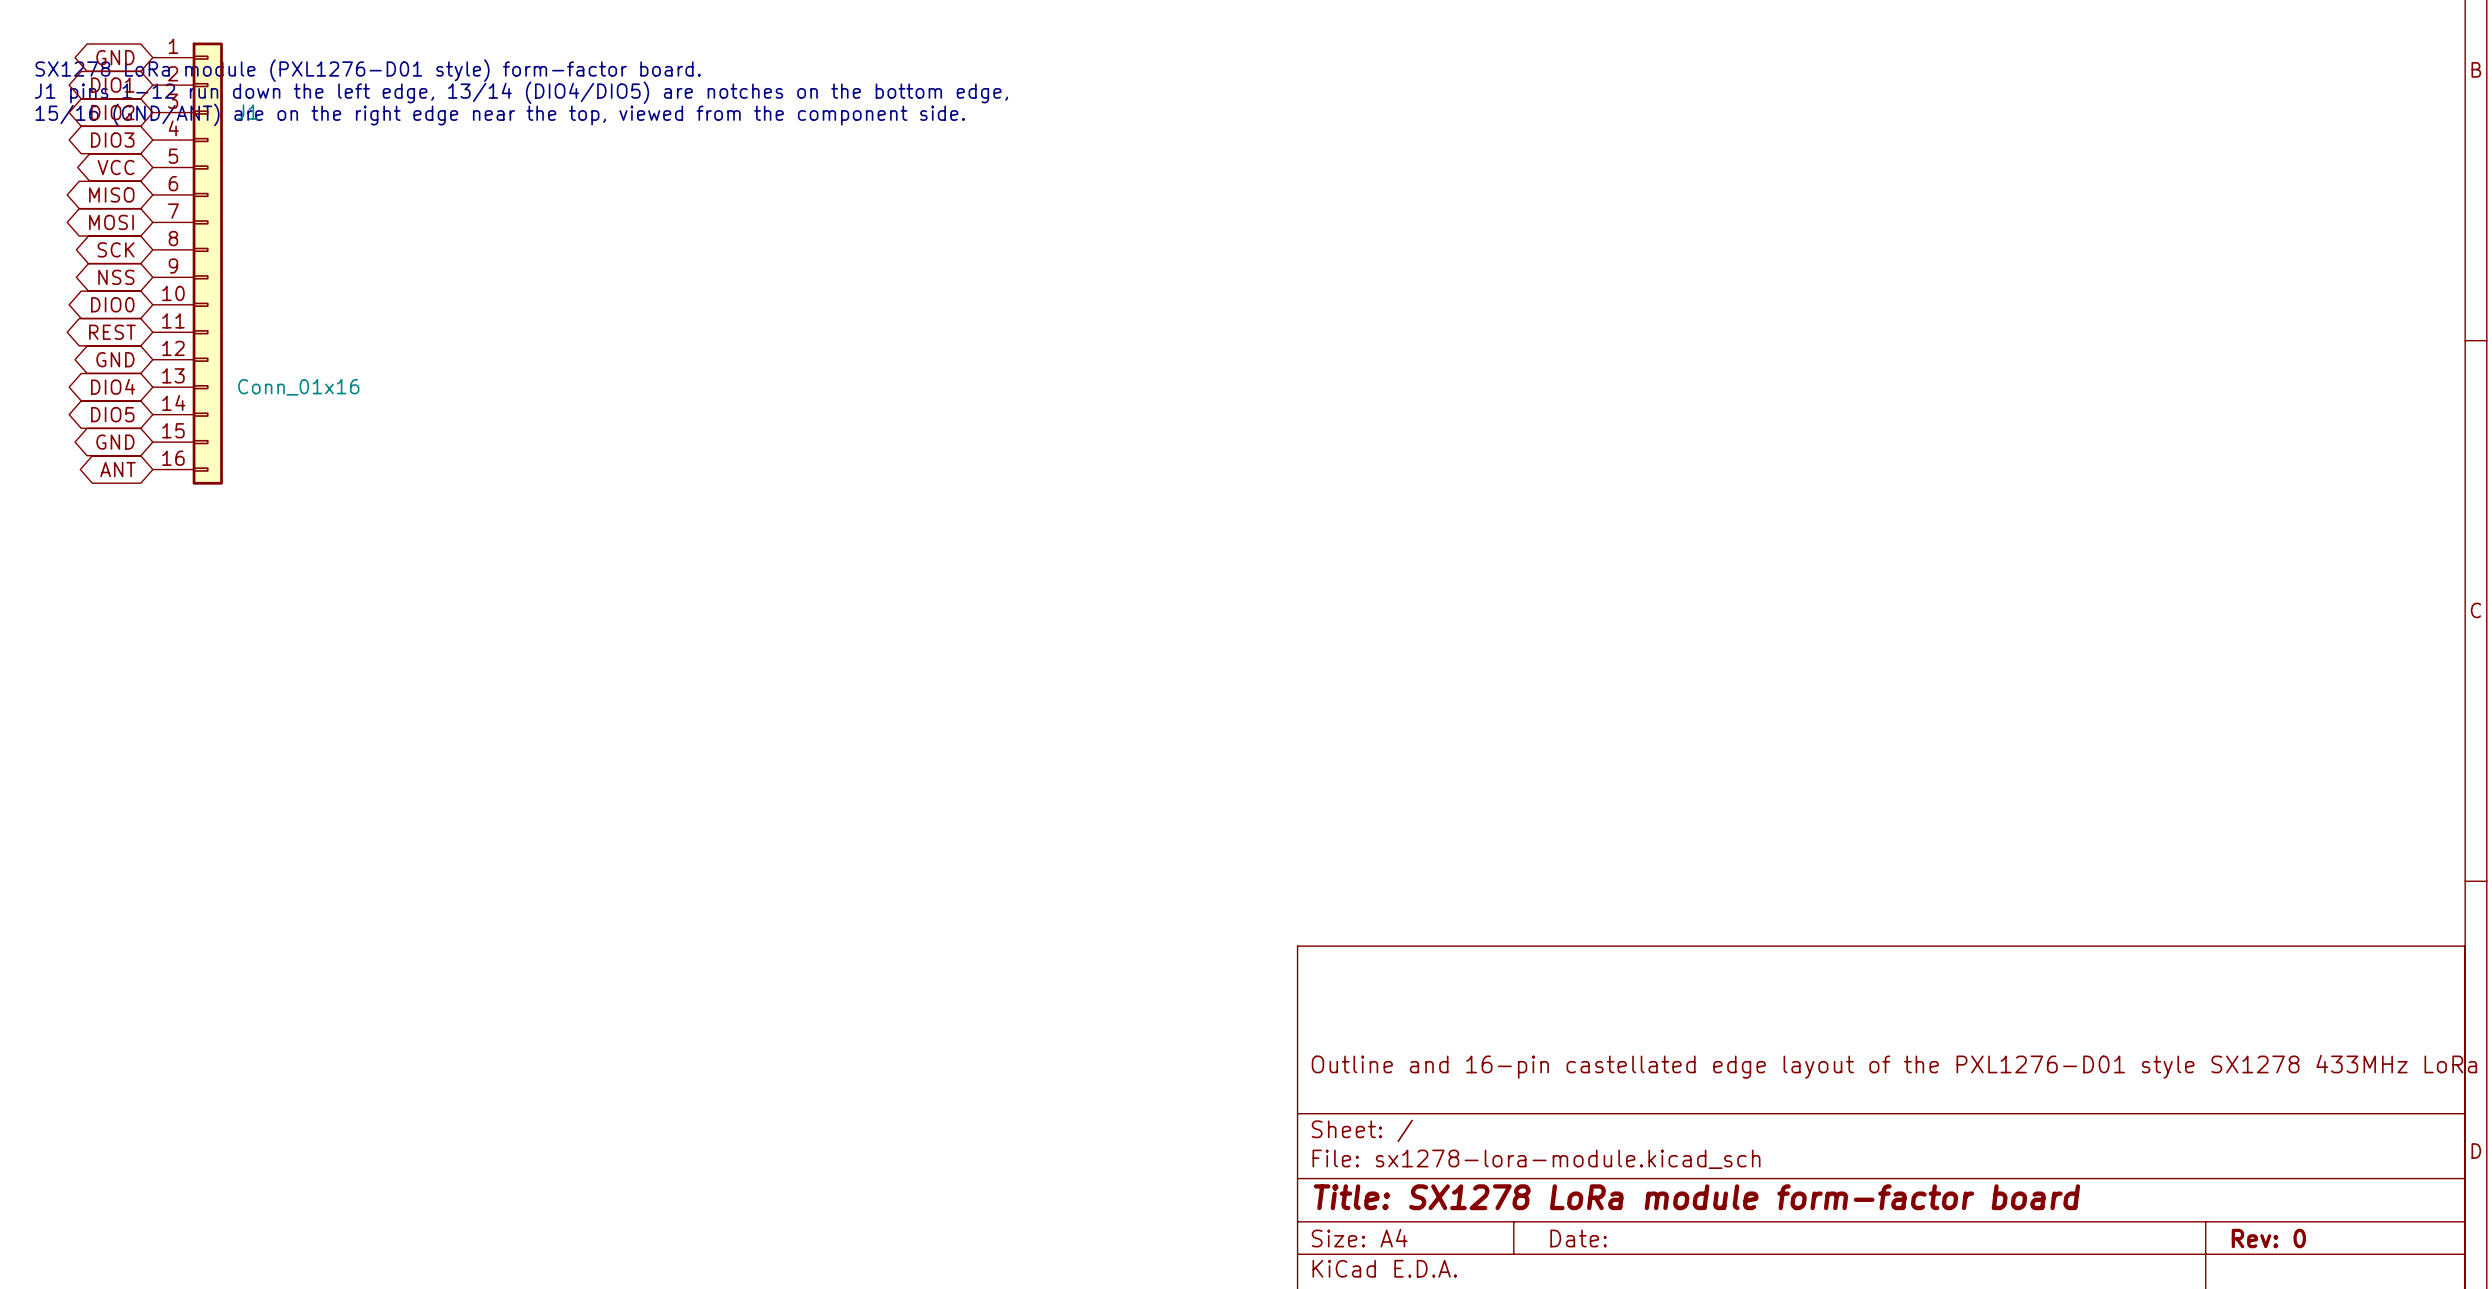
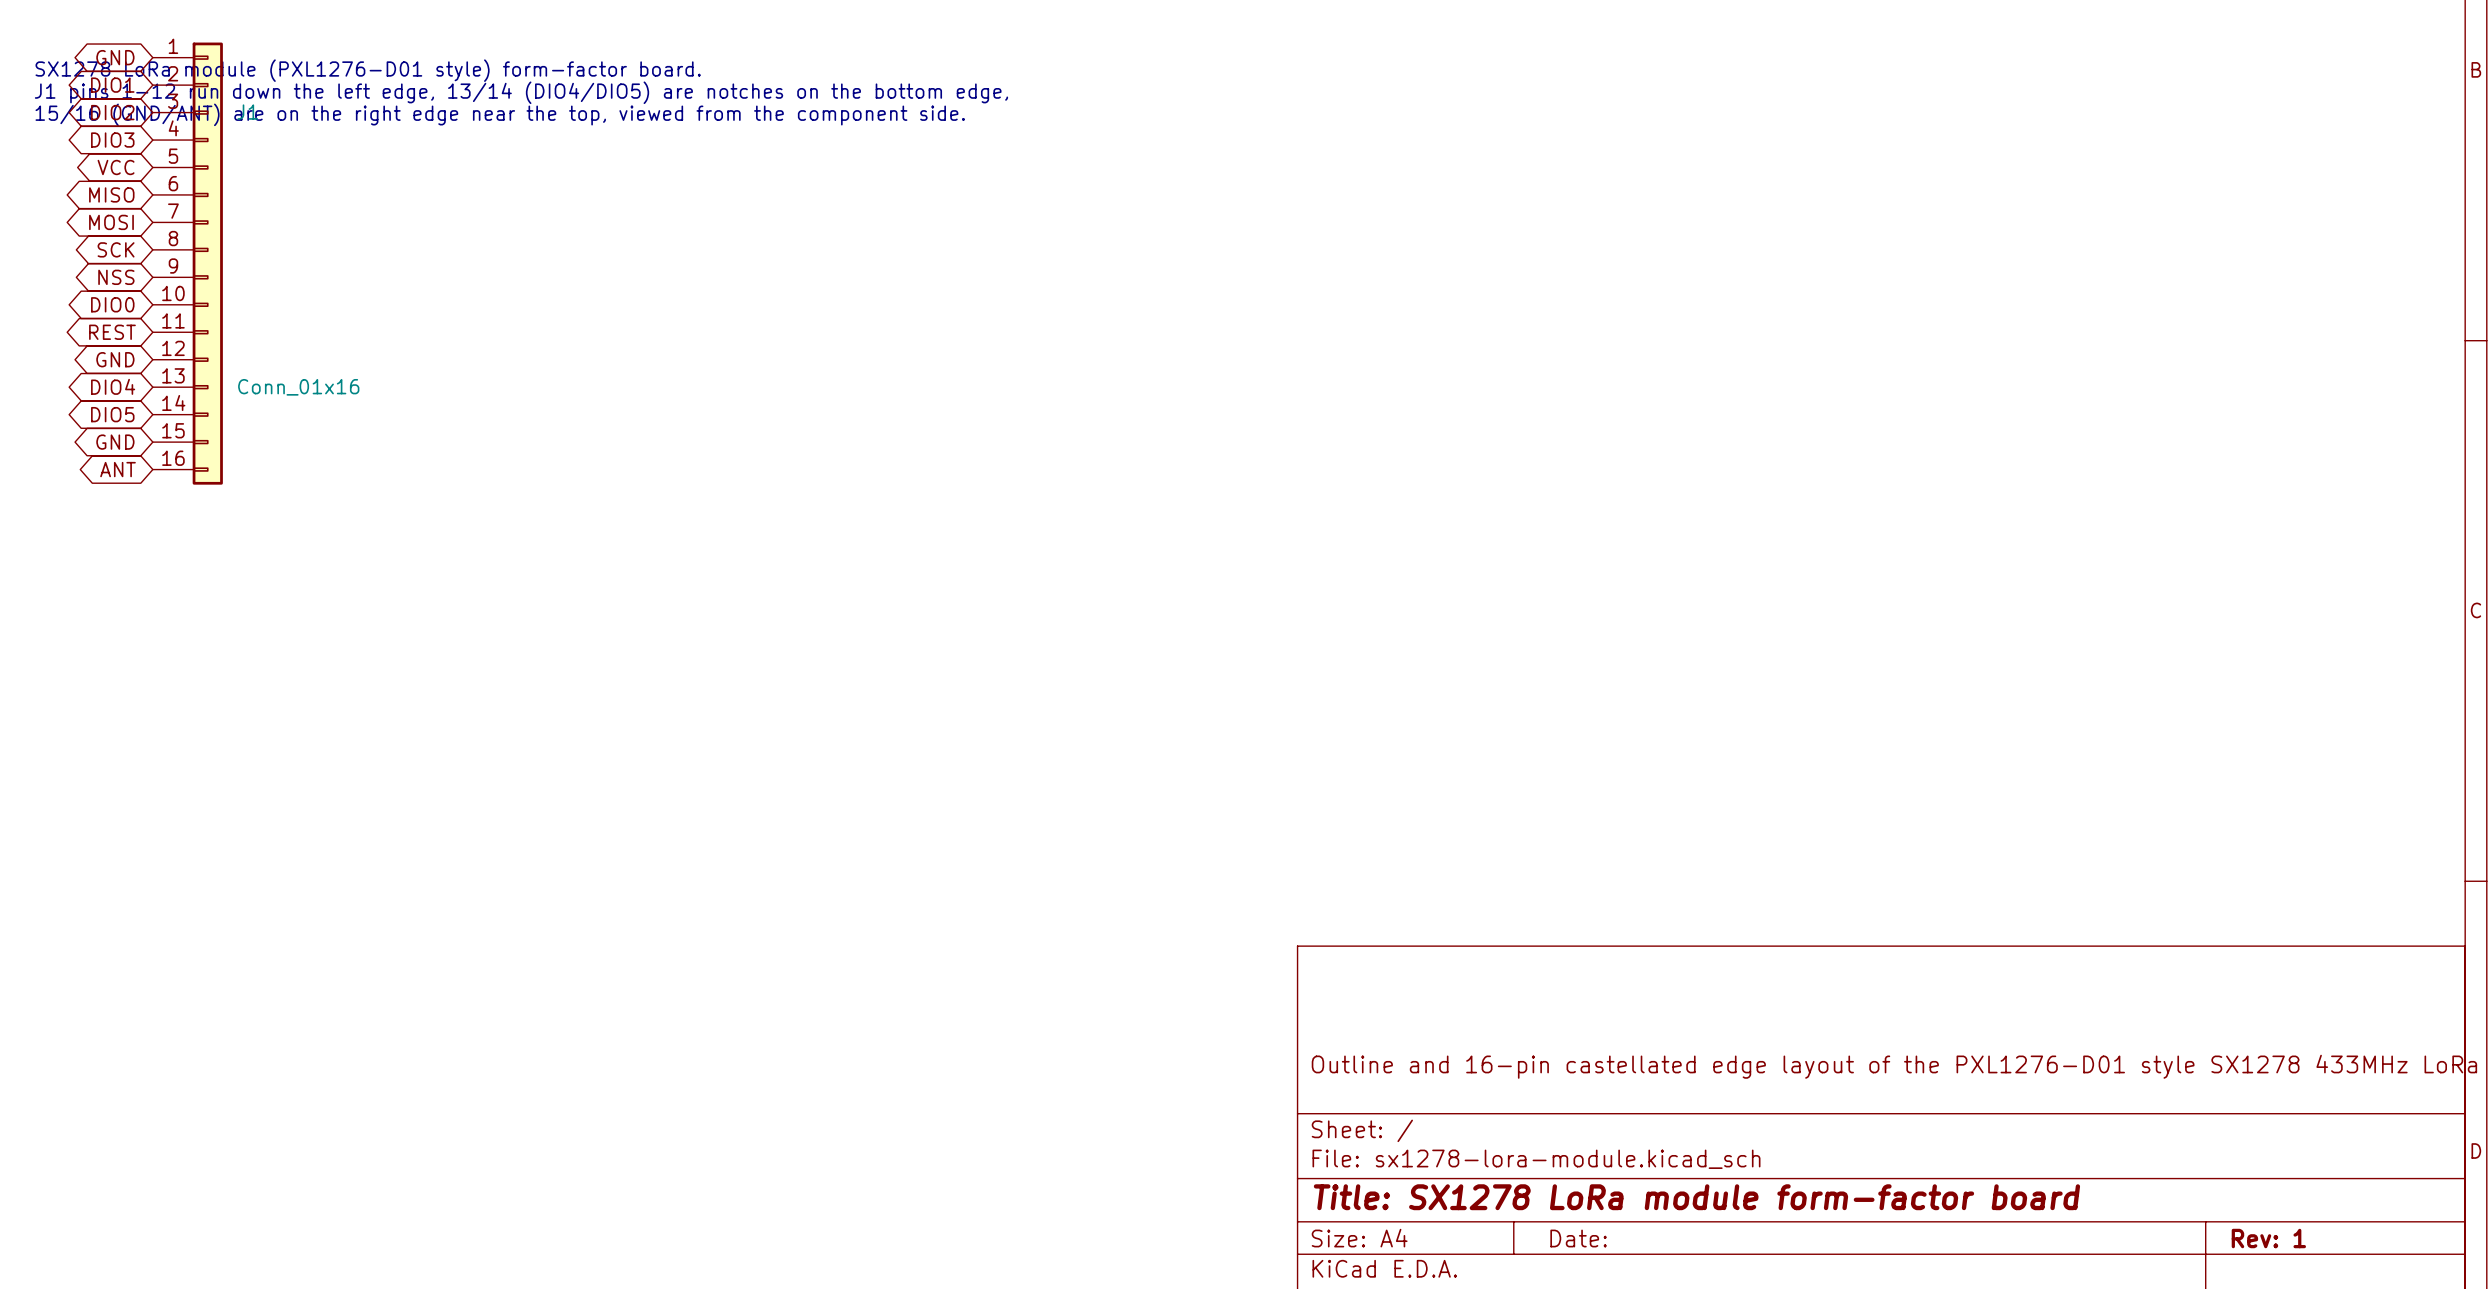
title block: Rev: 0 (2268, 1238) -> Rev: 1 (2268, 1238)

